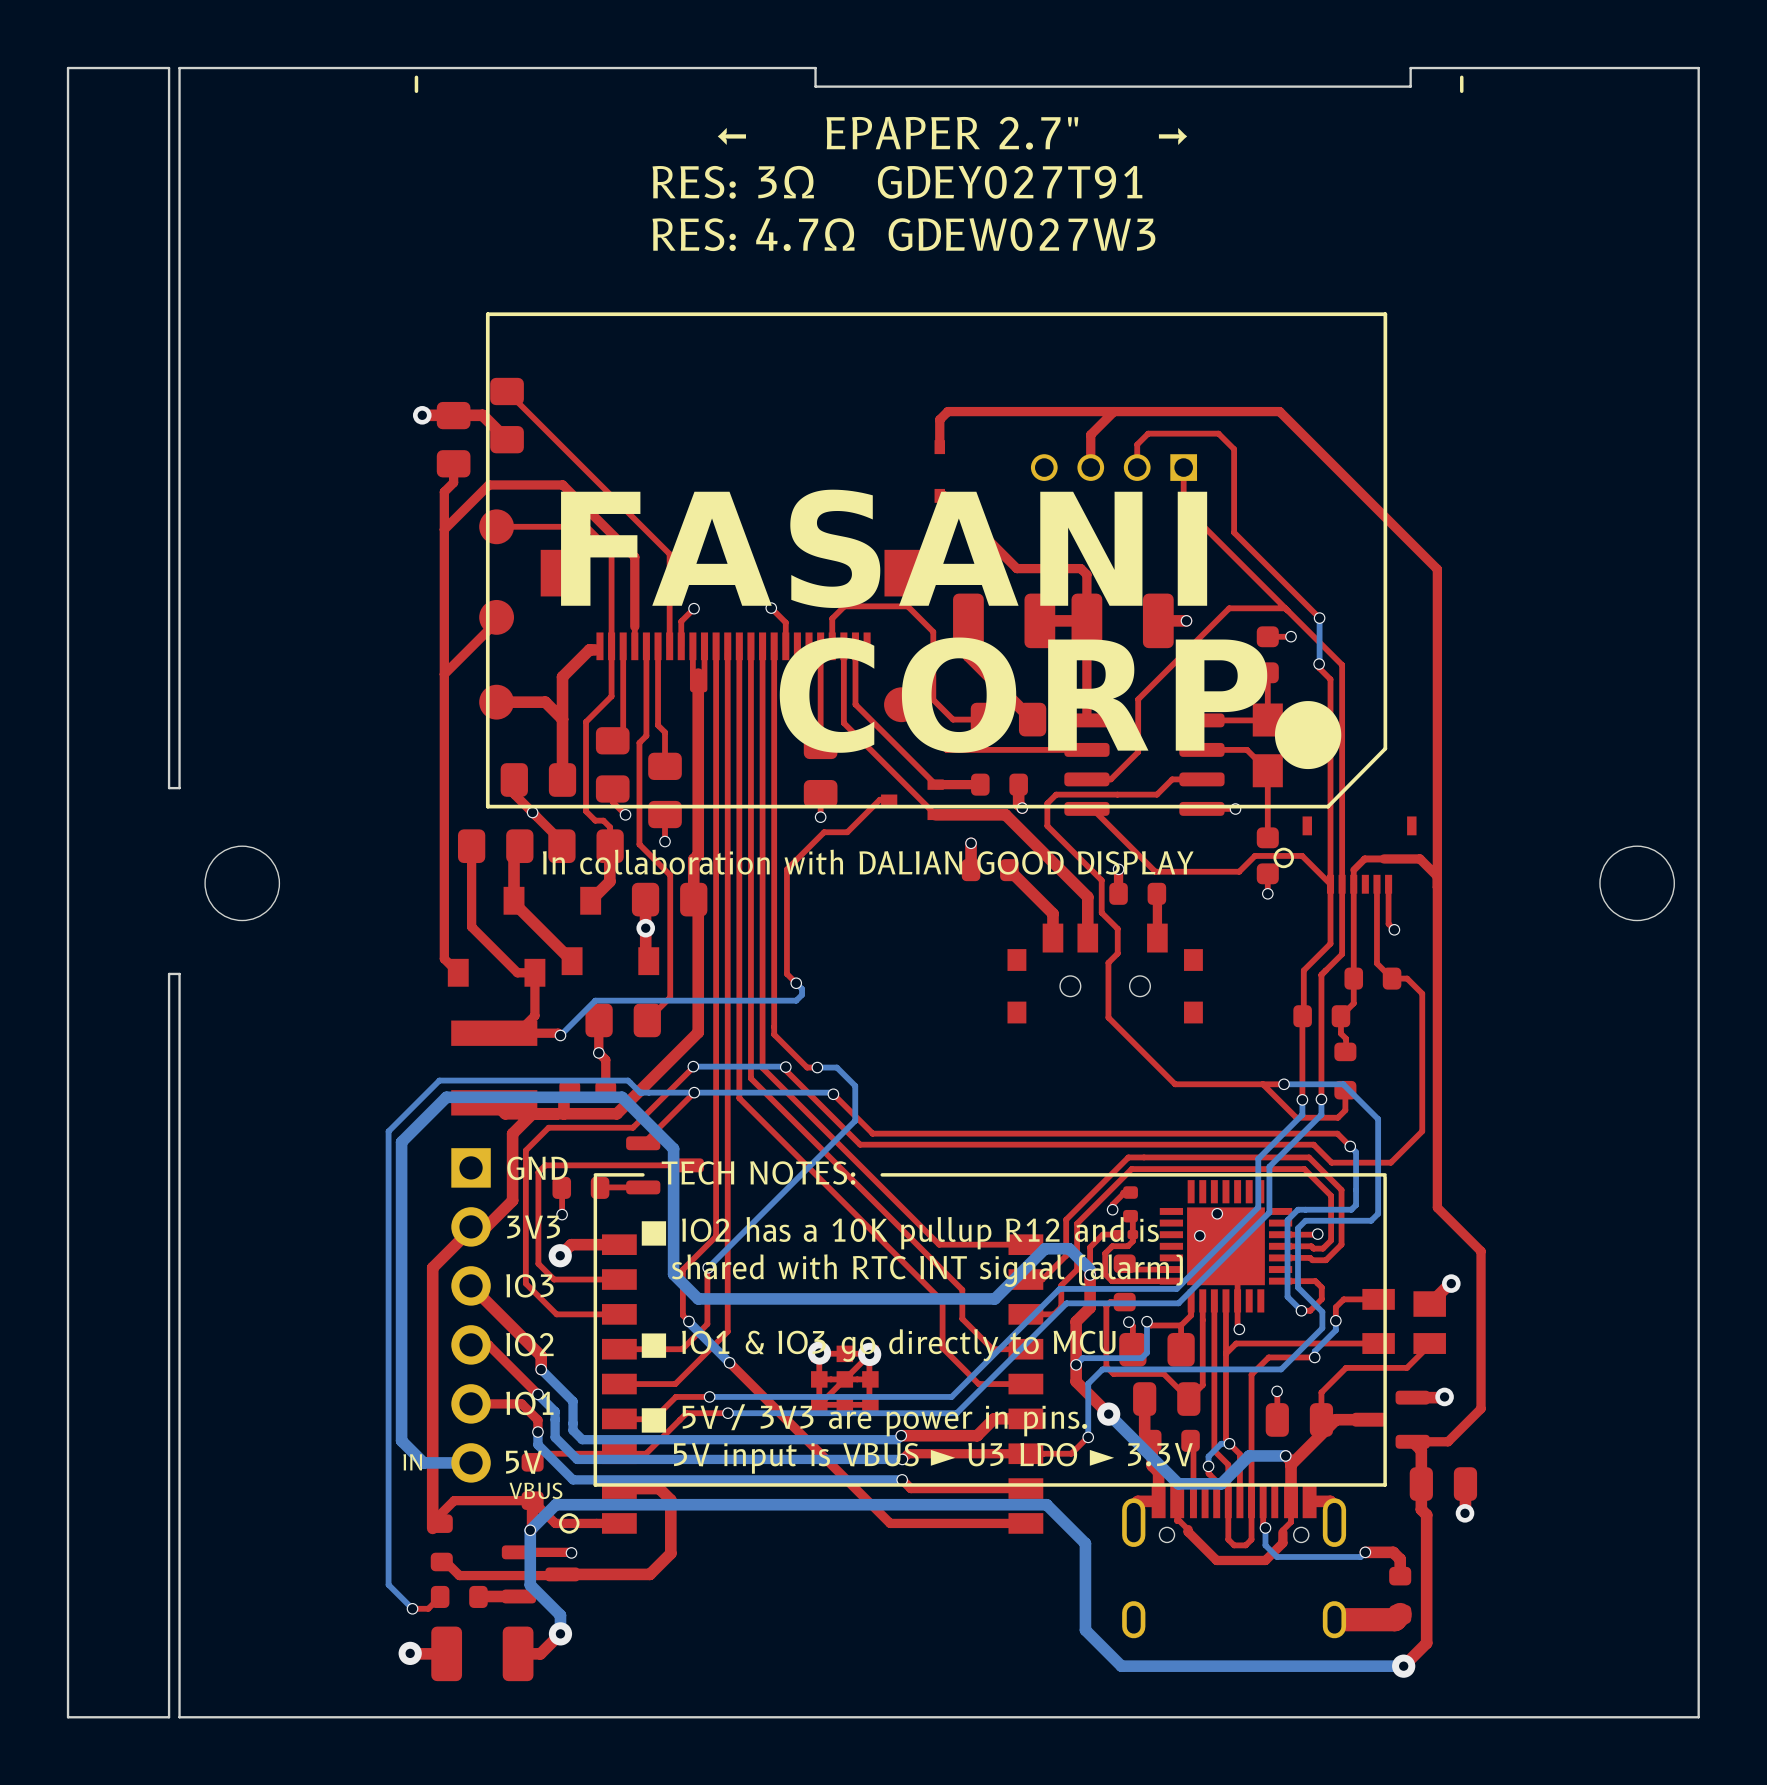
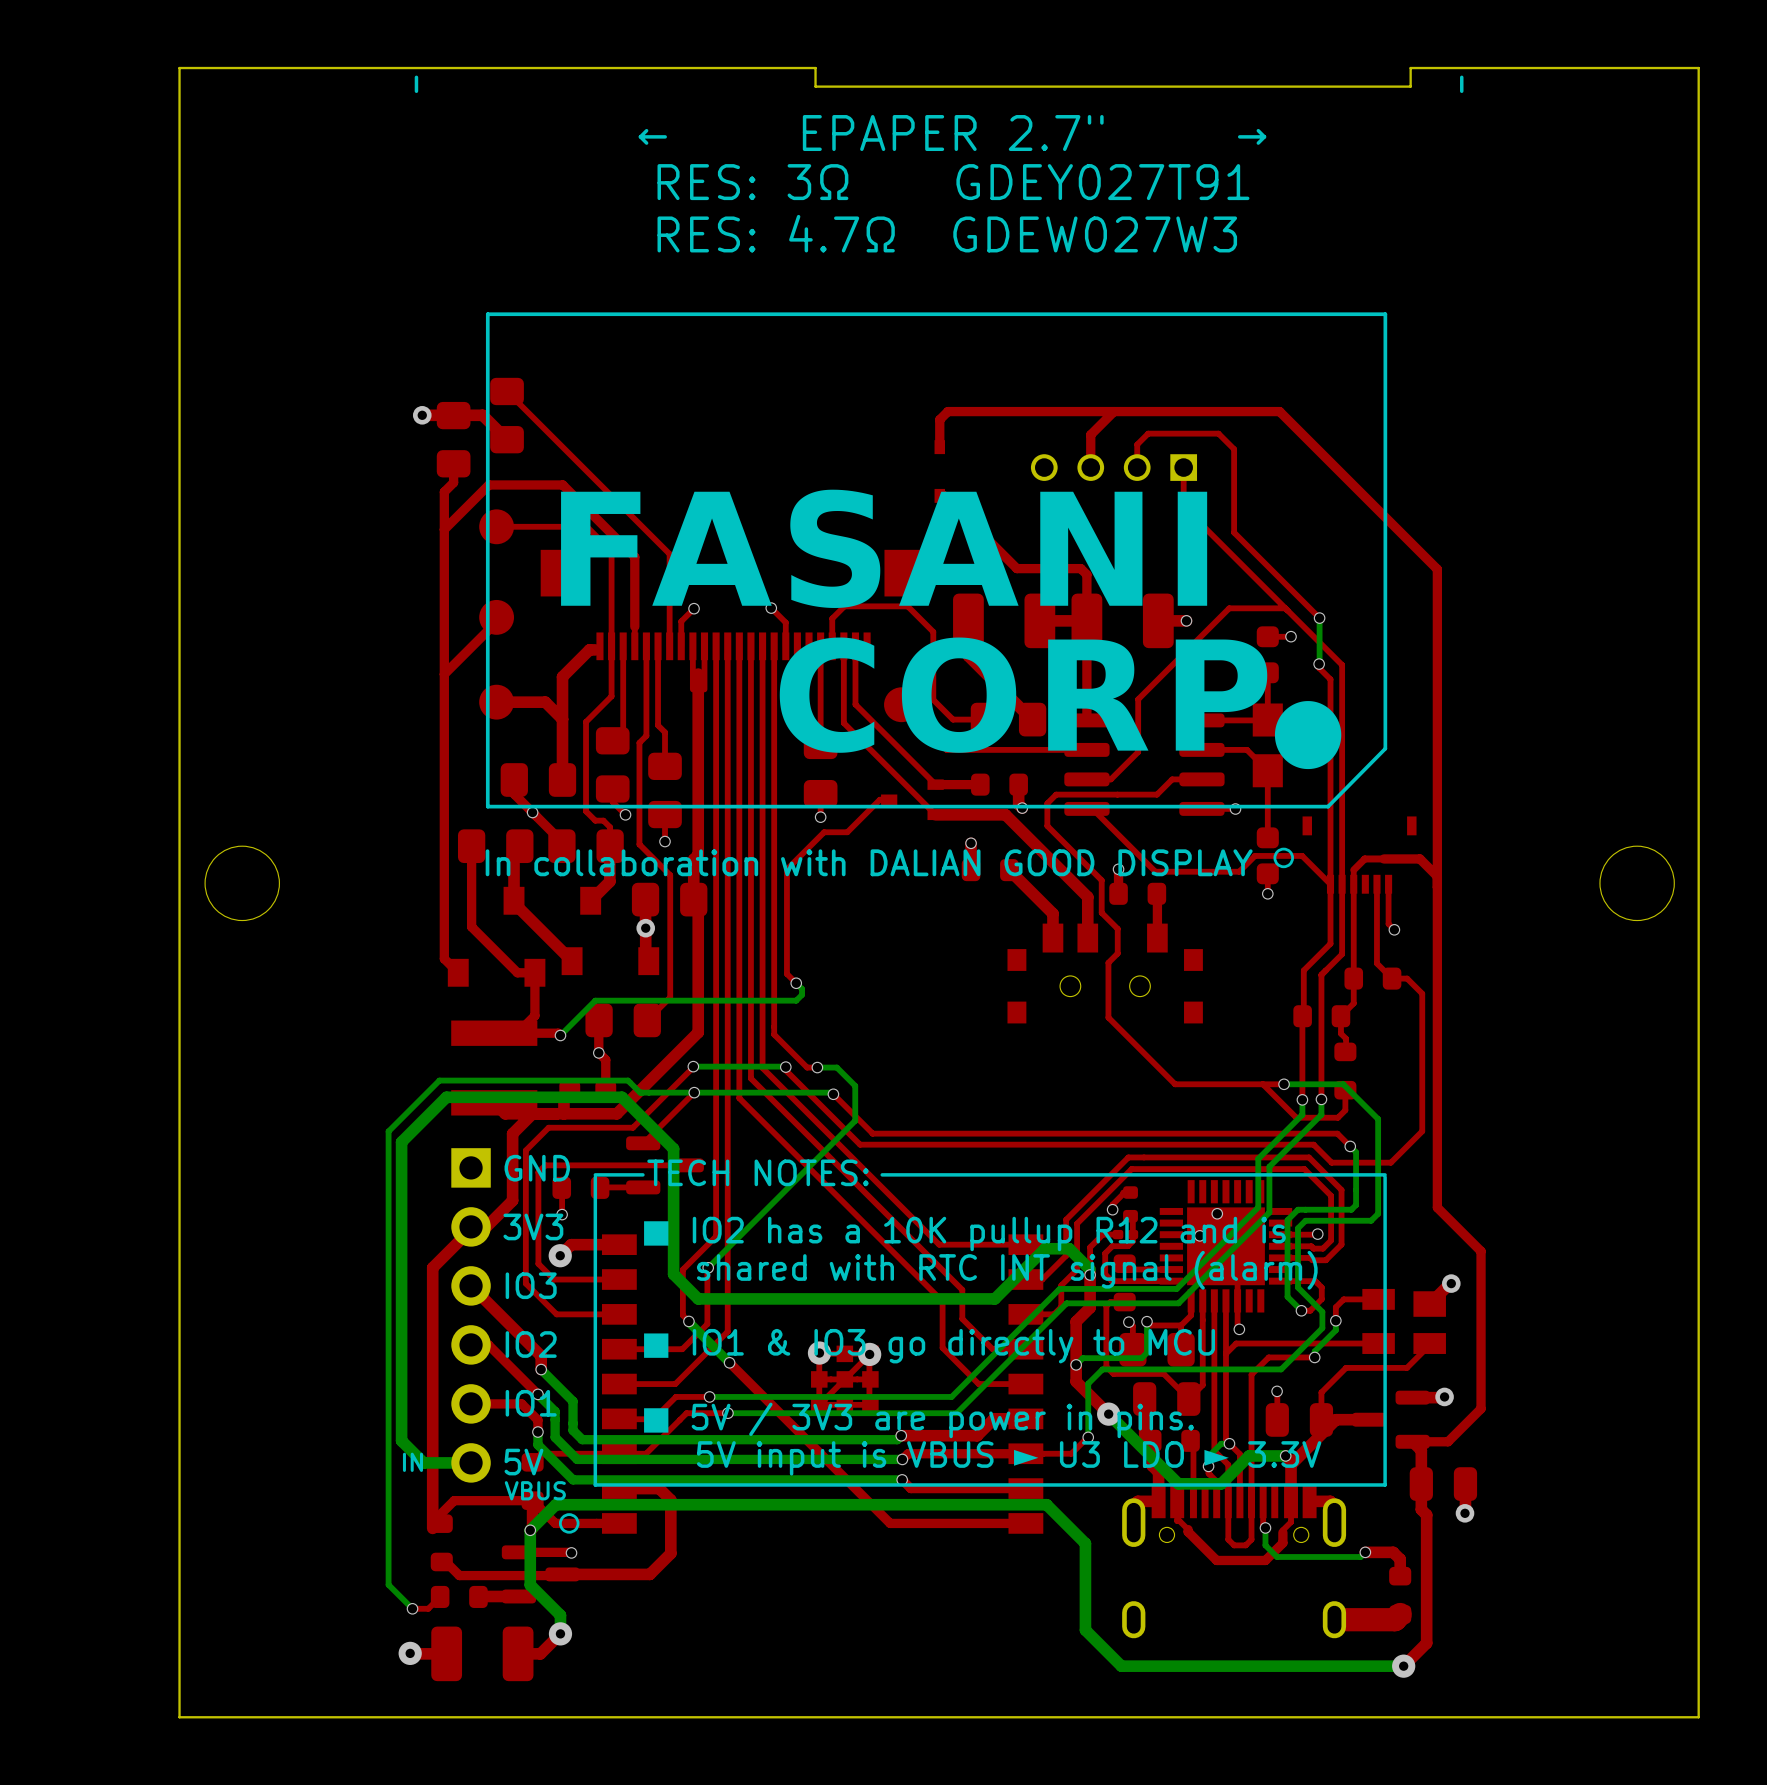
board edge: (179, 788) (169, 788) (169, 68) (68, 68) (68, 1717) (169, 1717) (169, 973) (179, 973) -> (179, 788) (179, 973)

